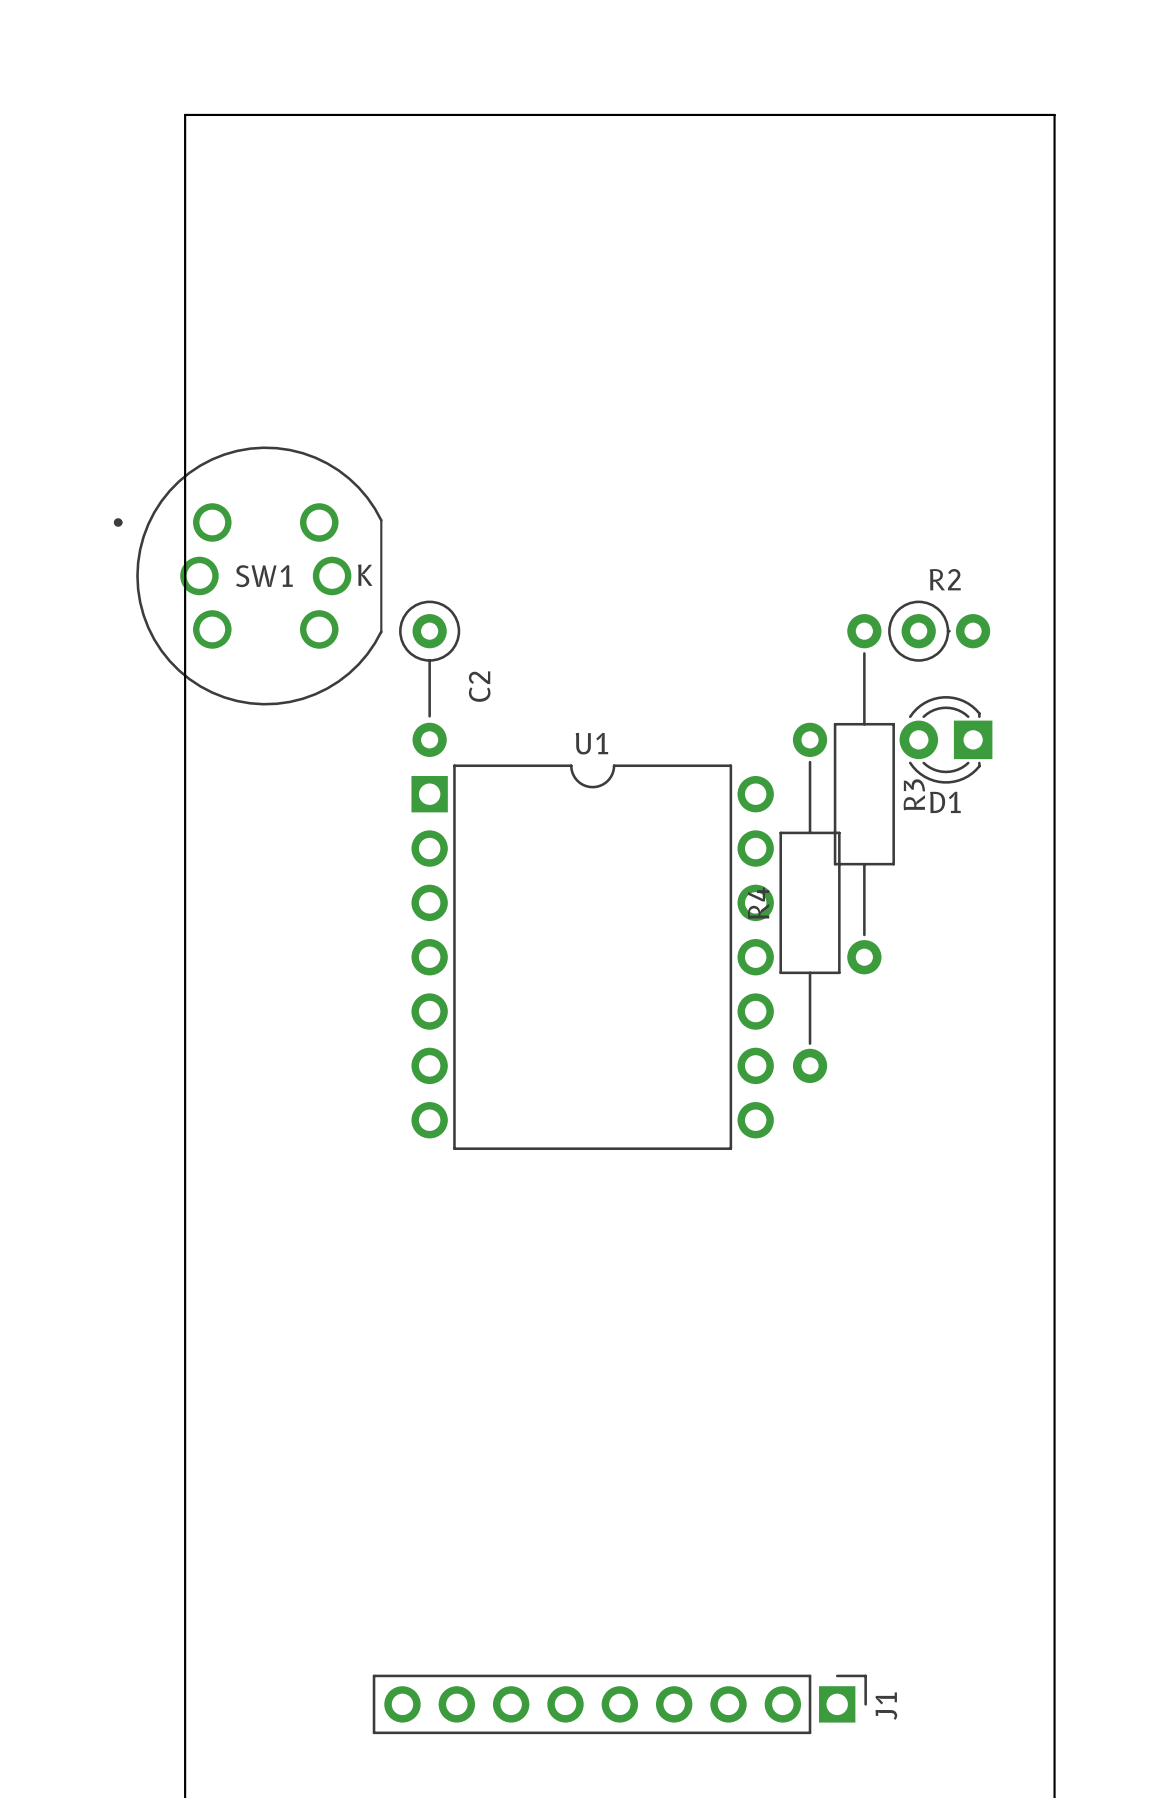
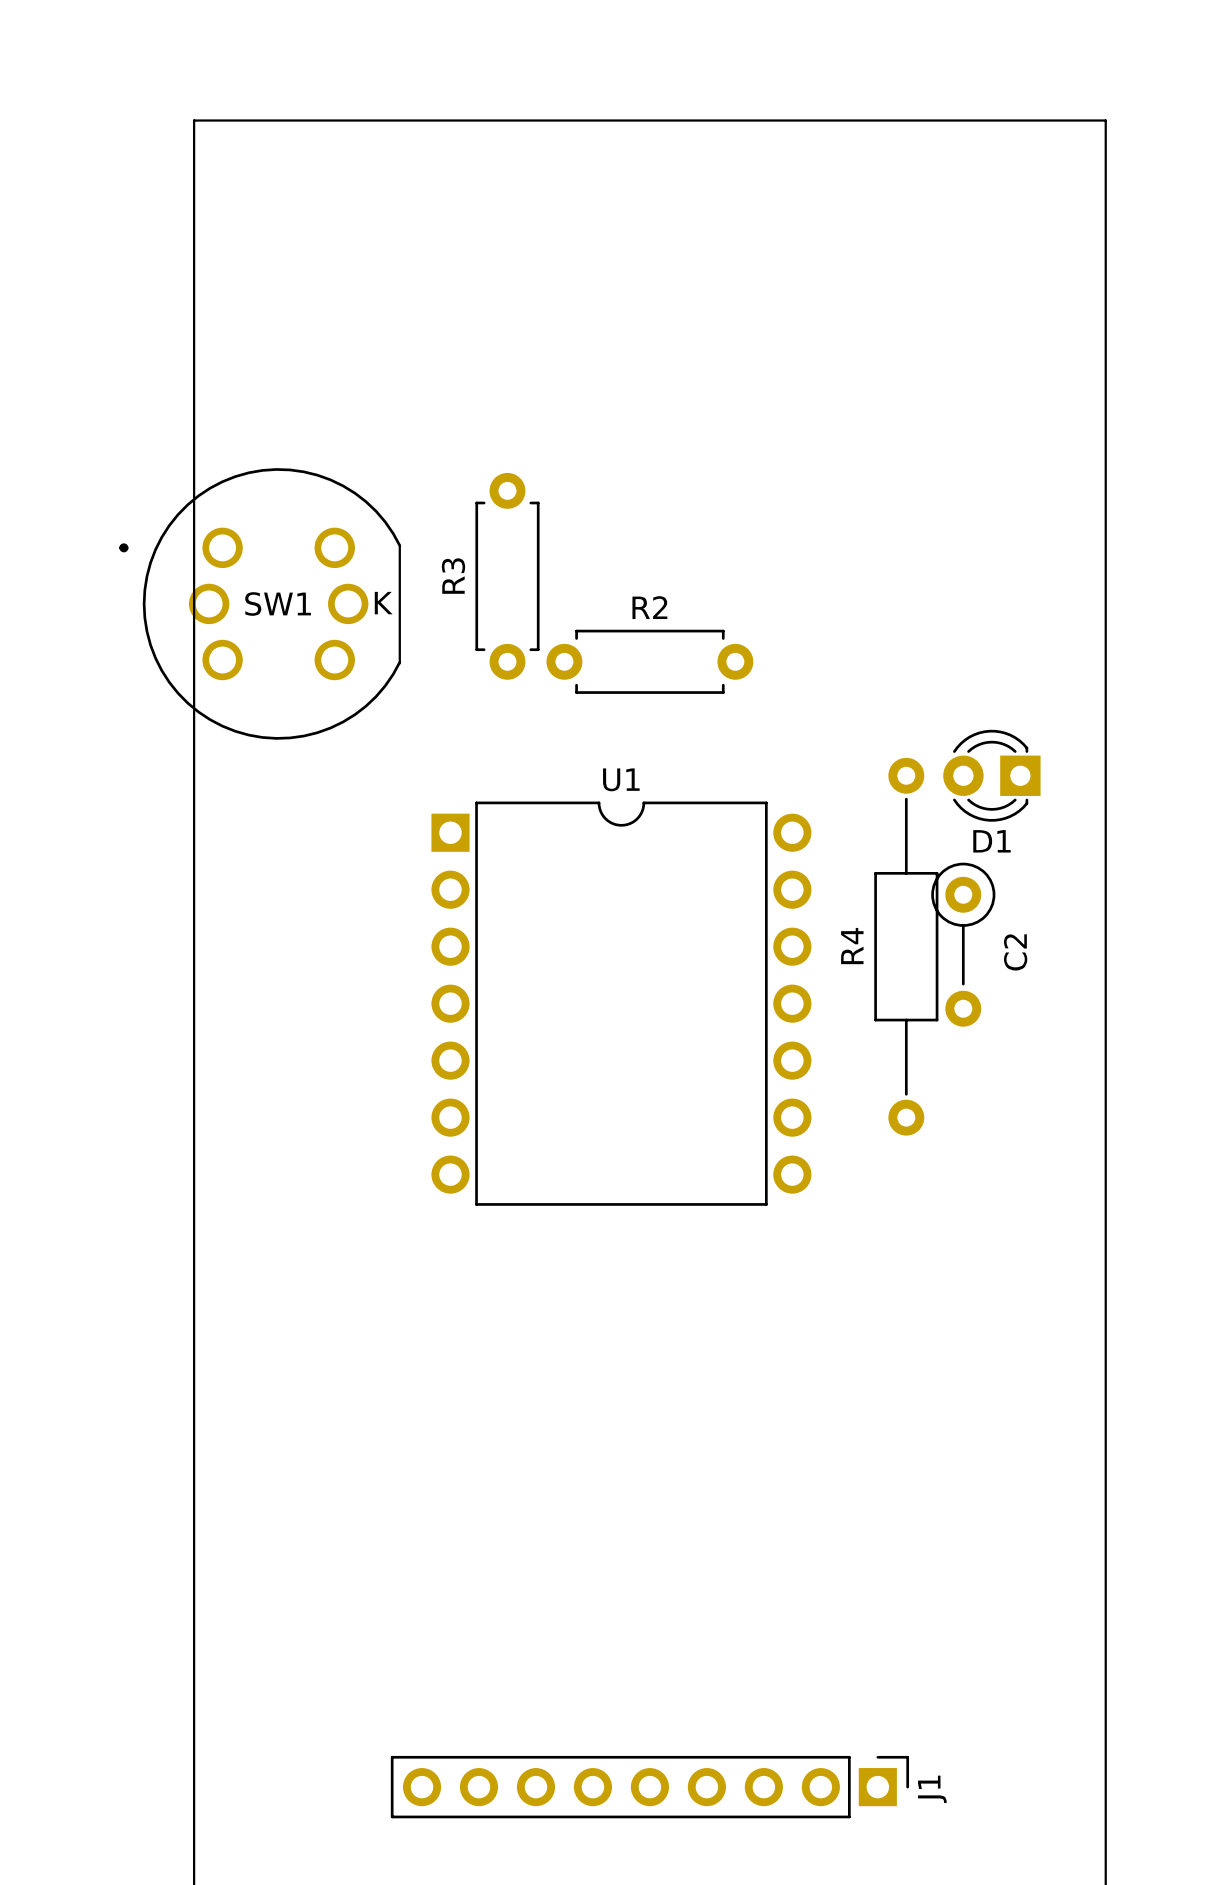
R2 footprint: [888, 600, 991, 662] -> [546, 629, 754, 694]
R3 footprint: [833, 614, 895, 975] -> [475, 472, 540, 680]
C2 position: (429, 678) -> (963, 944)
R3 name position: R3 (914, 794) -> R3 (453, 576)
R4 position: (810, 902) -> (906, 946)

